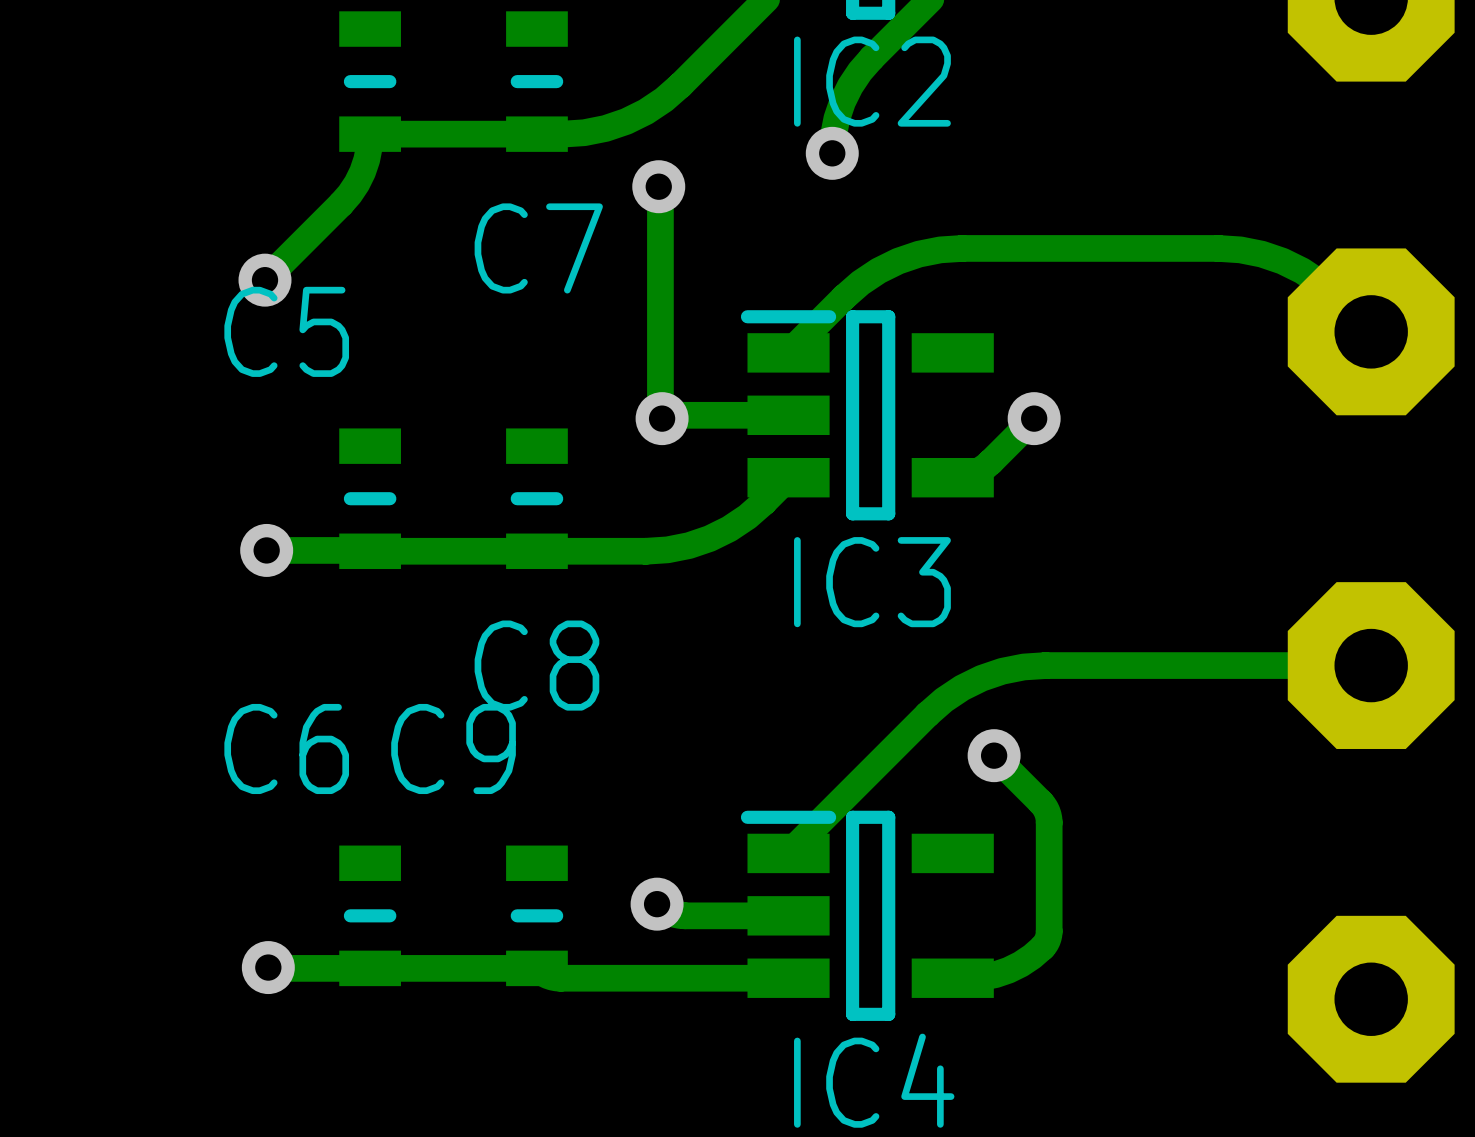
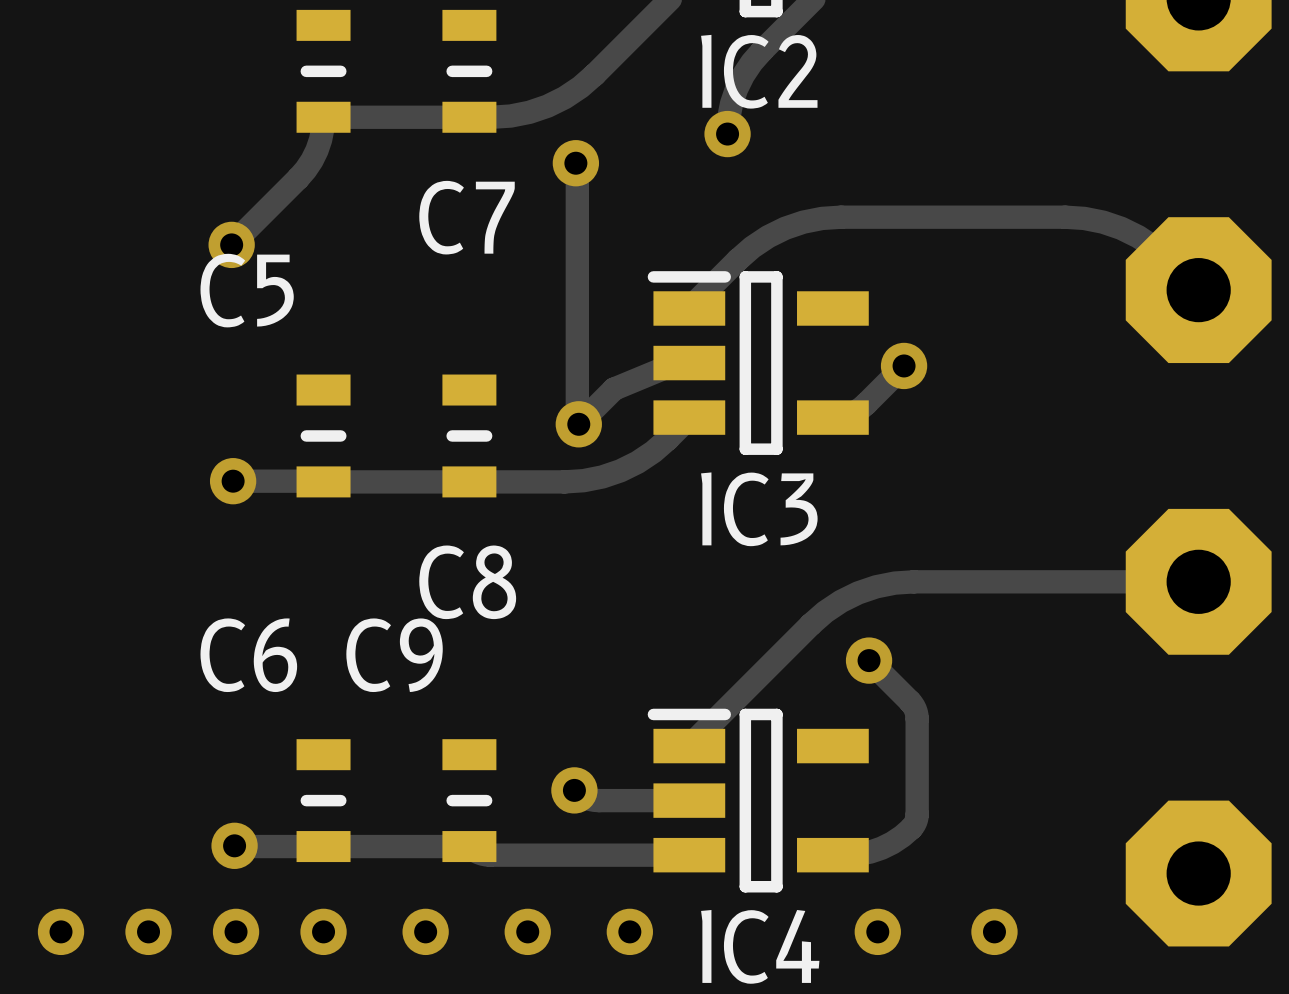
track: (774, 415) (670, 415) (662, 418) (660, 416) -> (676, 363) (614, 389) (578, 424) (577, 364)
via position: (662, 418) -> (578, 424)
via: none -> (61, 931)
via: none -> (148, 931)
via: none -> (236, 931)
via: none -> (323, 931)
via: none -> (425, 931)
via: none -> (527, 931)
via: none -> (629, 931)
via: none -> (877, 931)
via: none -> (994, 931)

